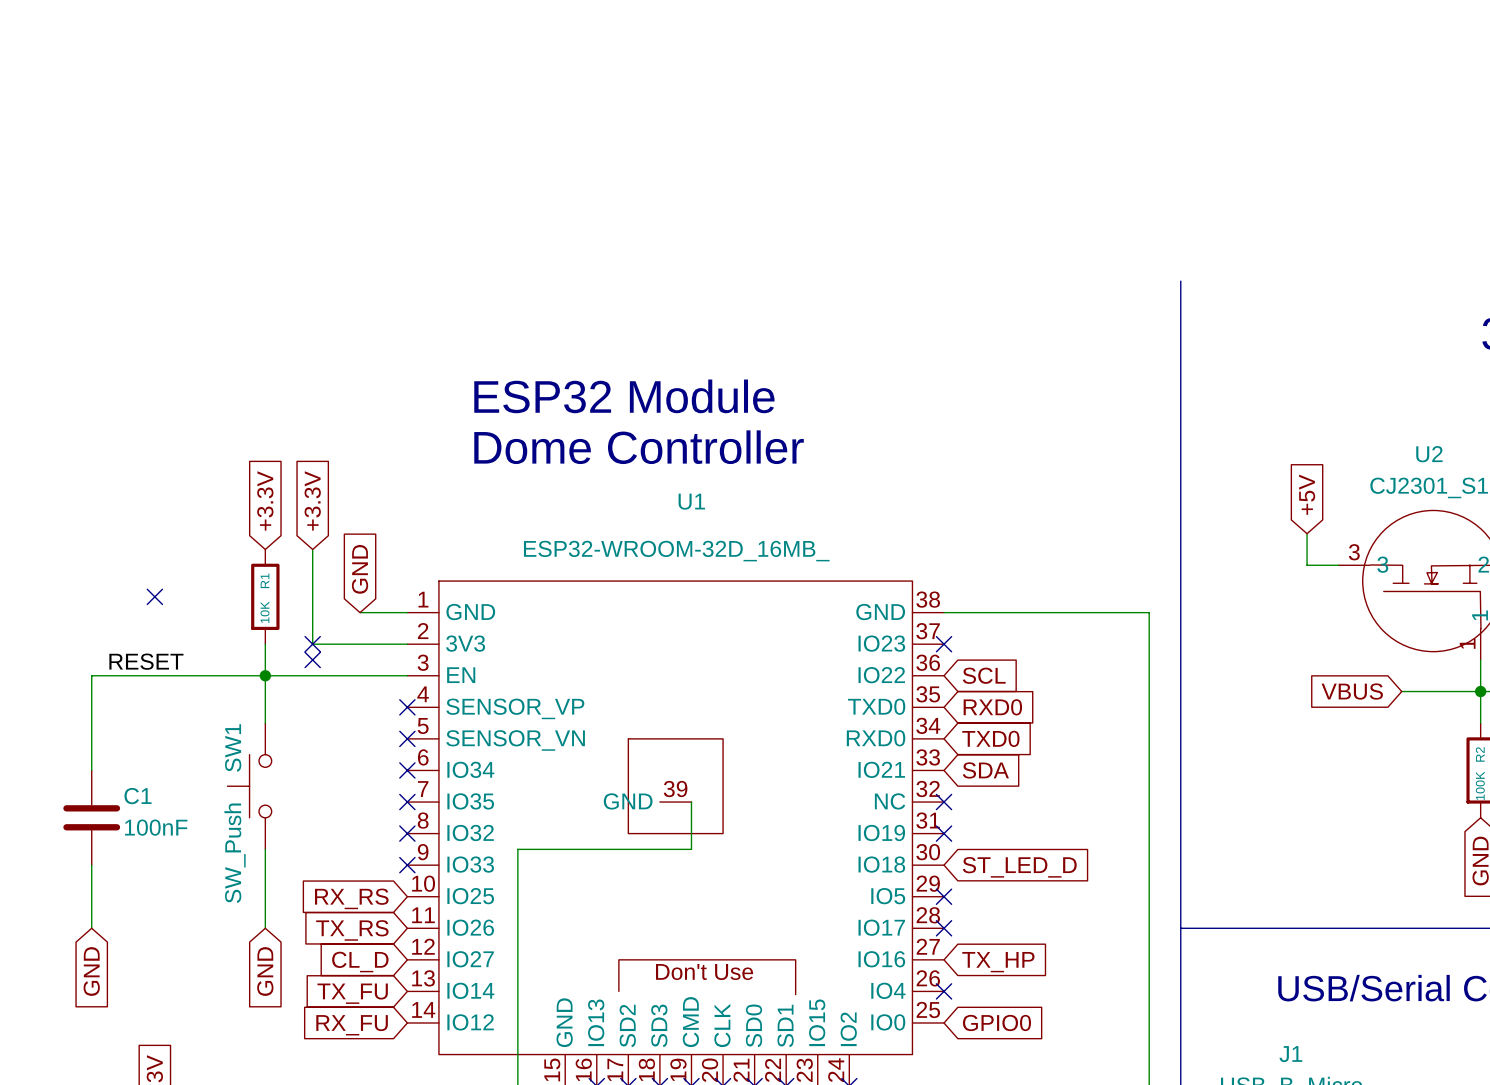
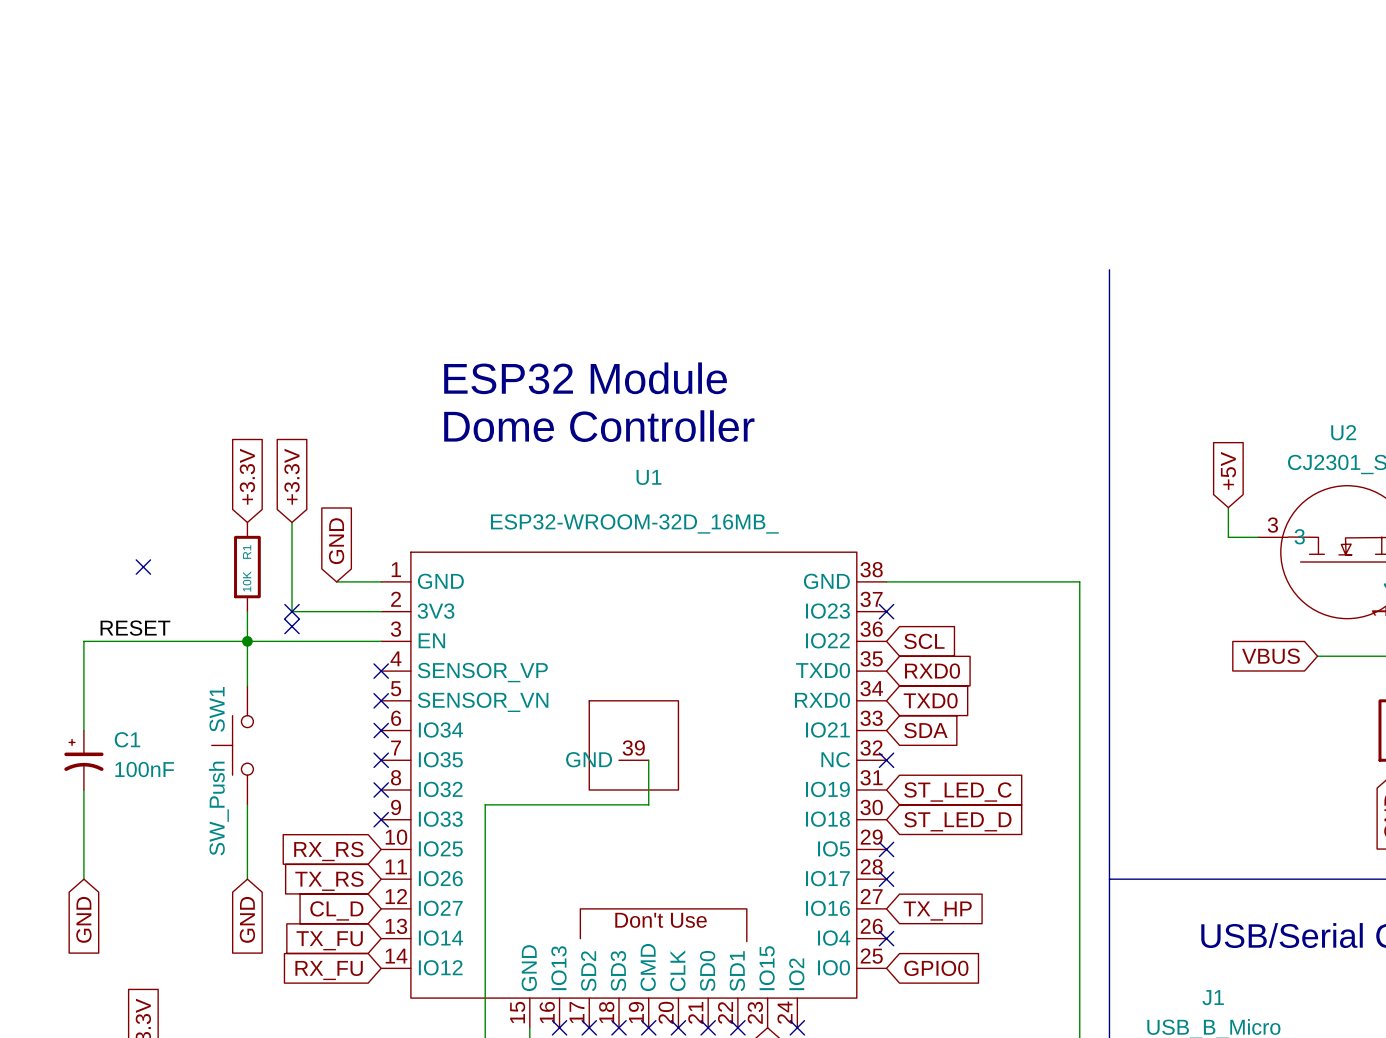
C1 symbol: [63, 770, 121, 866] -> [64, 730, 104, 791]
no-connect mark: (944, 833) -> none
global label: none -> ST_LED_C (957, 792)

